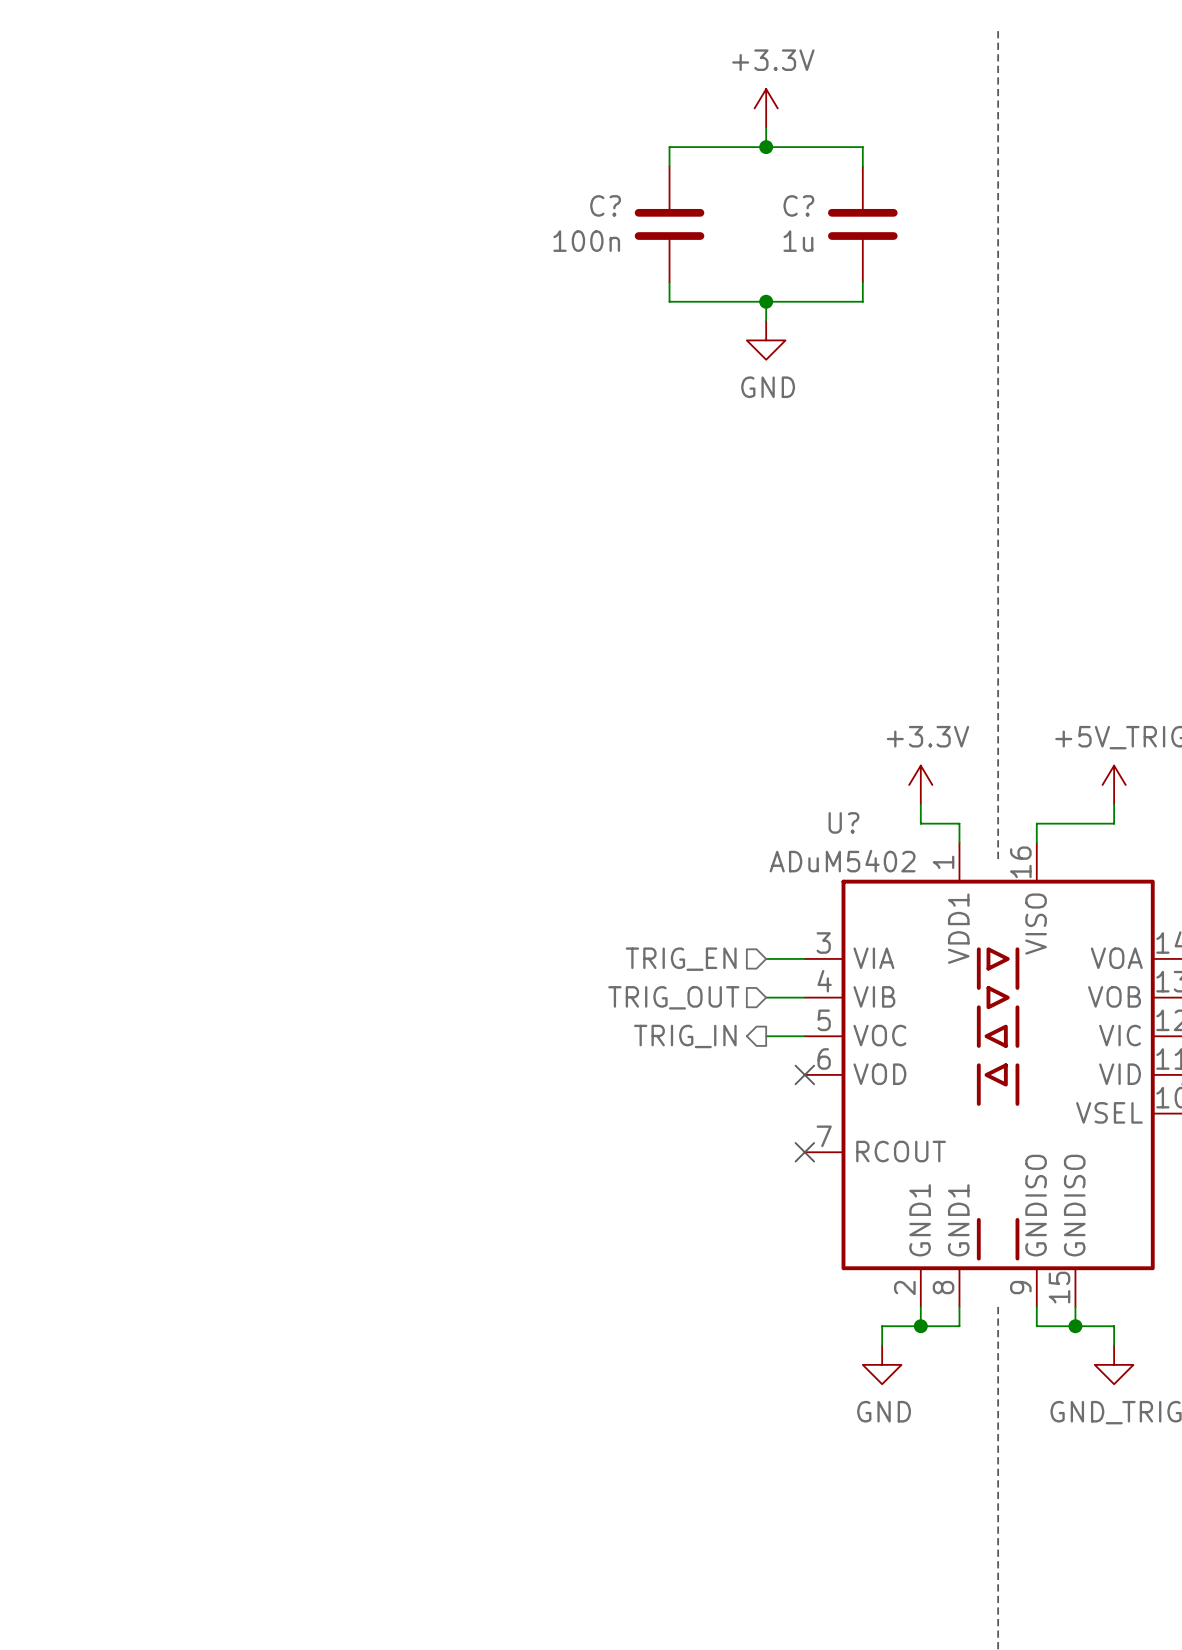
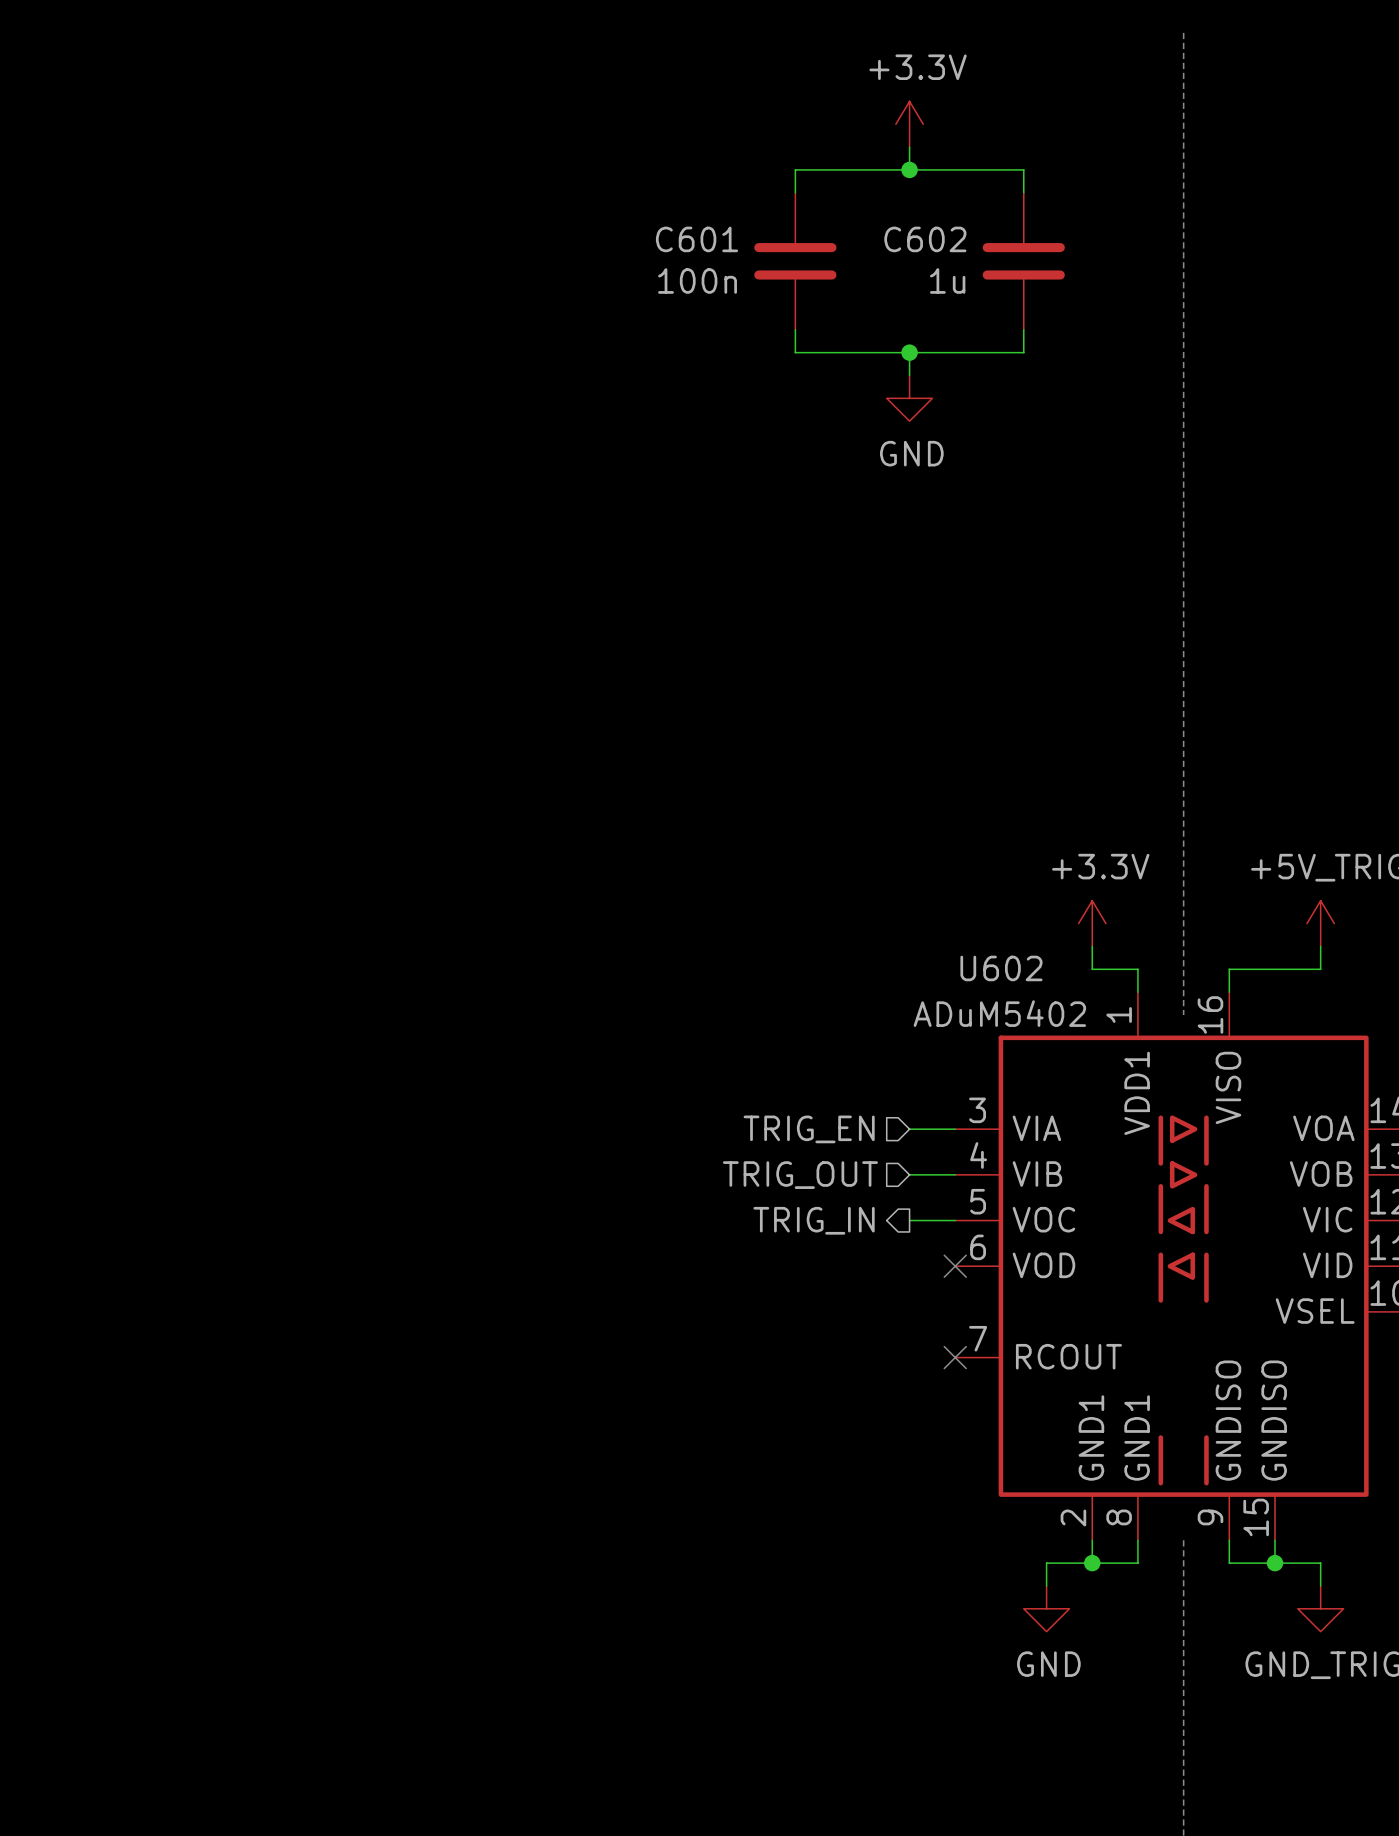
C? name: C? (605, 205) -> C601 (696, 239)
C? name: C? (798, 205) -> C602 (925, 239)
U? name: U? (843, 822) -> U602 (1001, 968)

